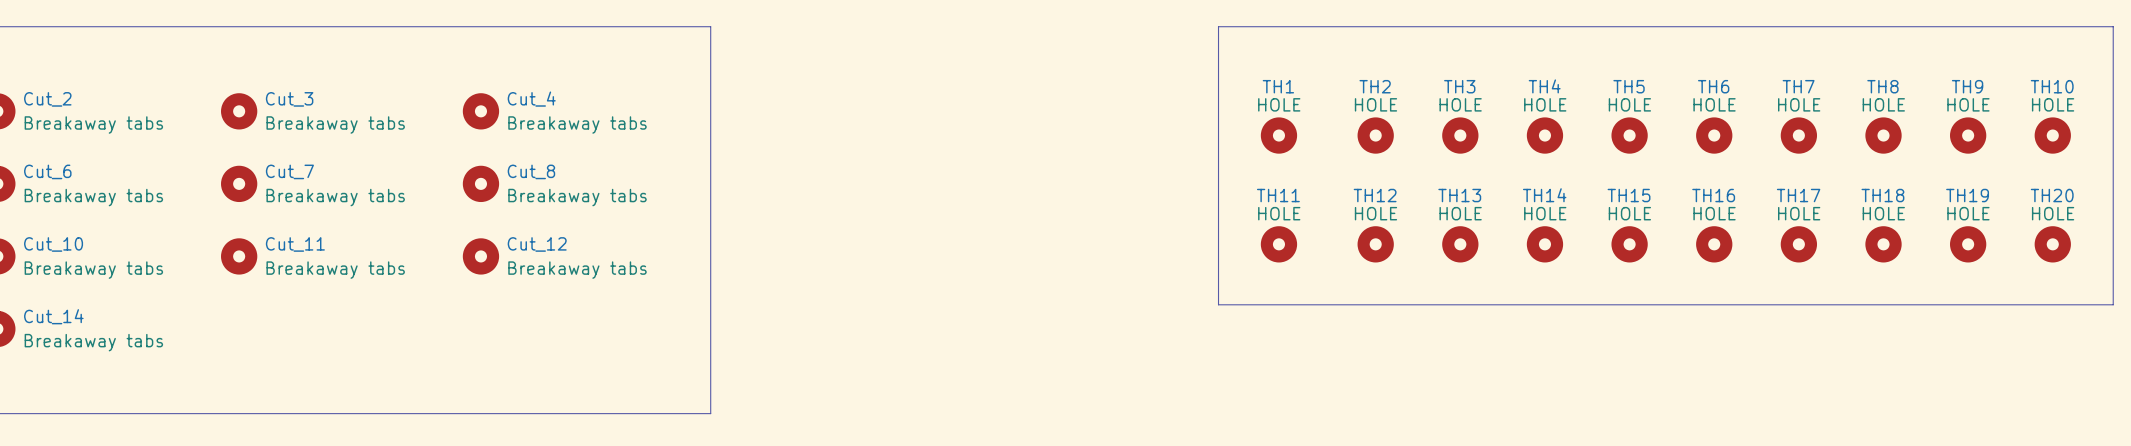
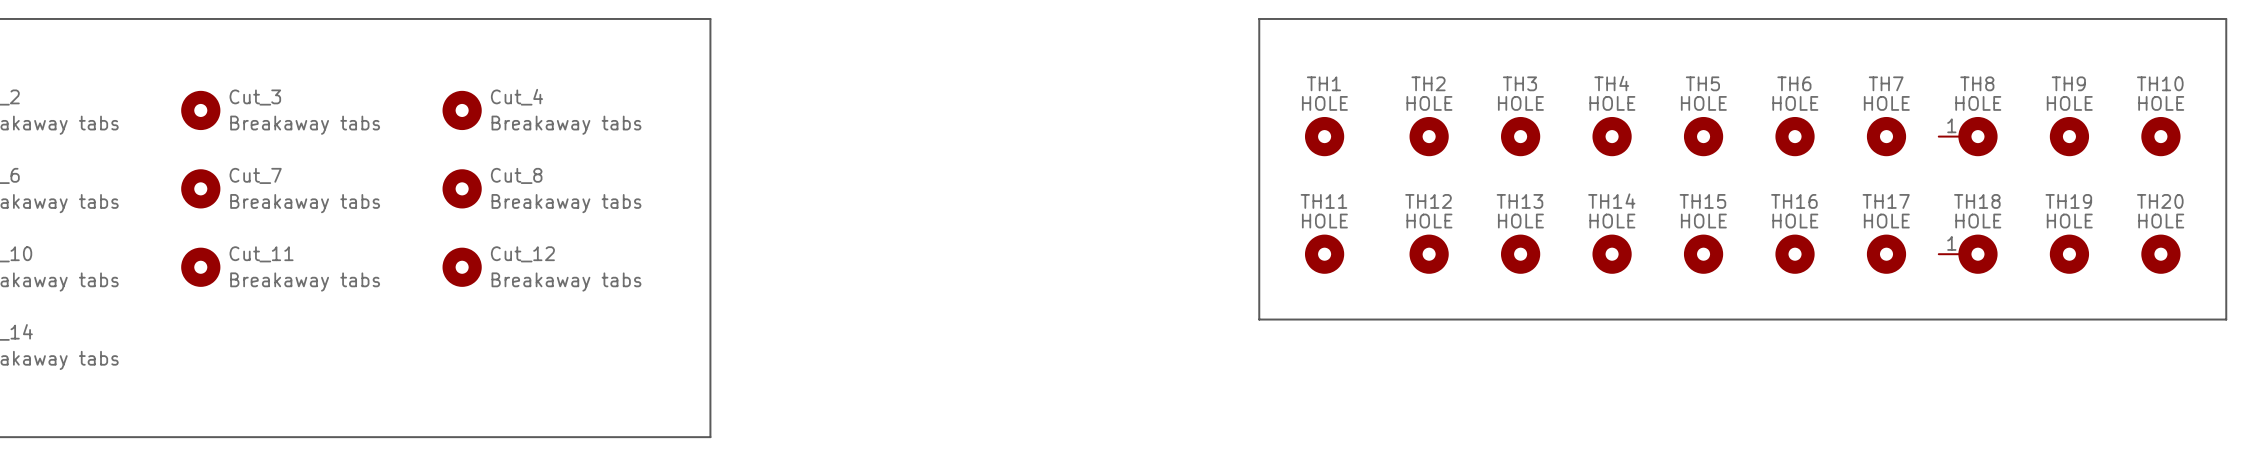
TH8 symbol: [1865, 117, 1902, 154] -> [1938, 116, 1998, 157]
TH18 symbol: [1865, 226, 1902, 263] -> [1938, 234, 1998, 274]

